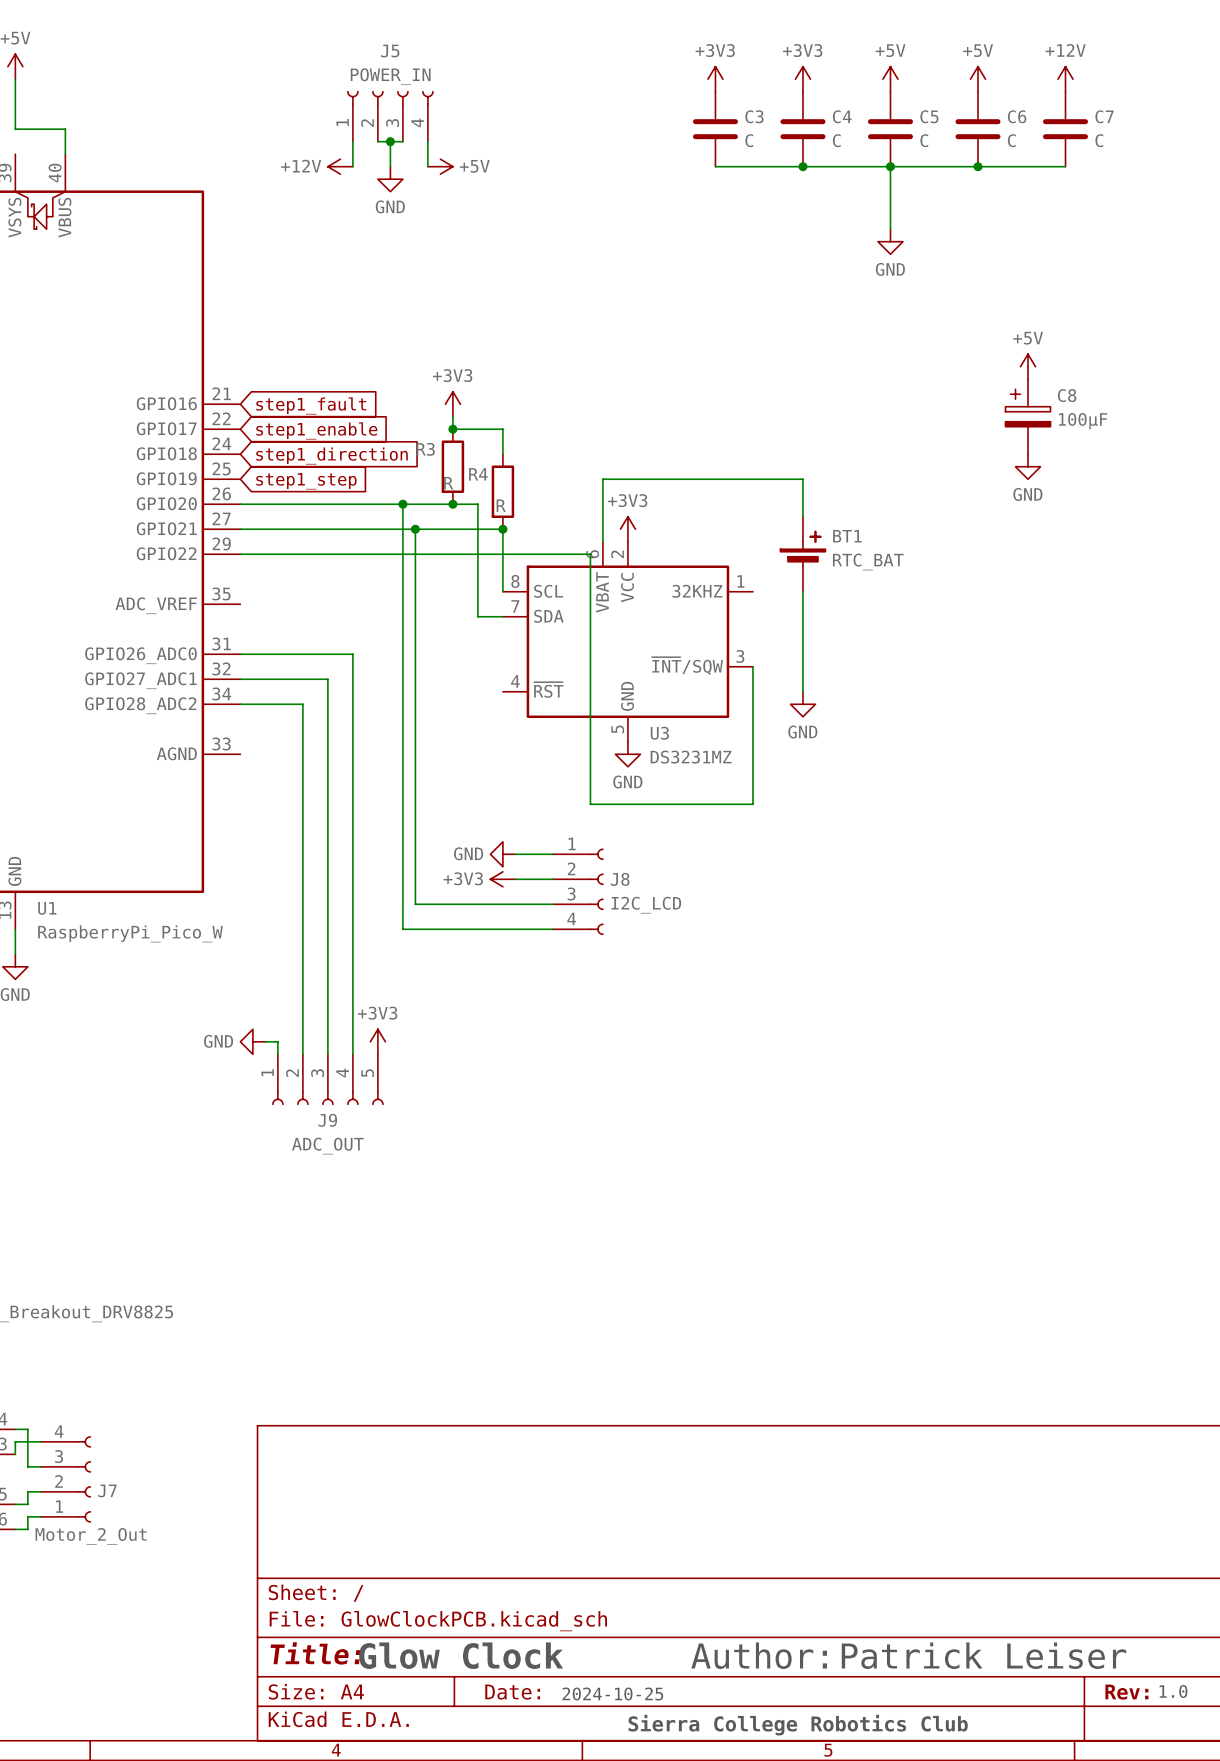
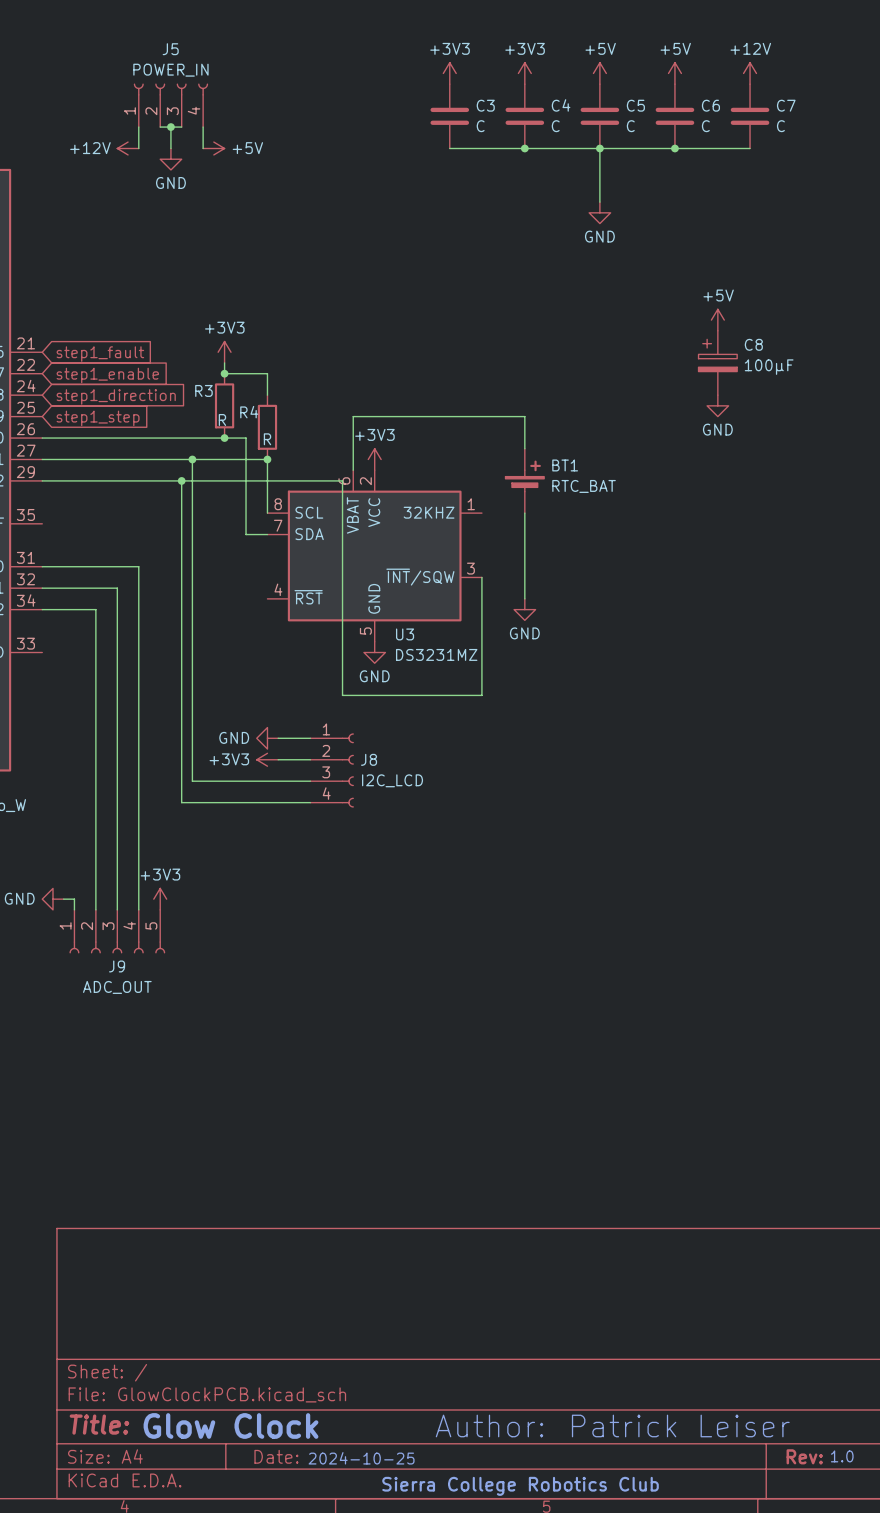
wire: (402, 504) (402, 554) -> none
junction position: (402, 504) -> (181, 480)

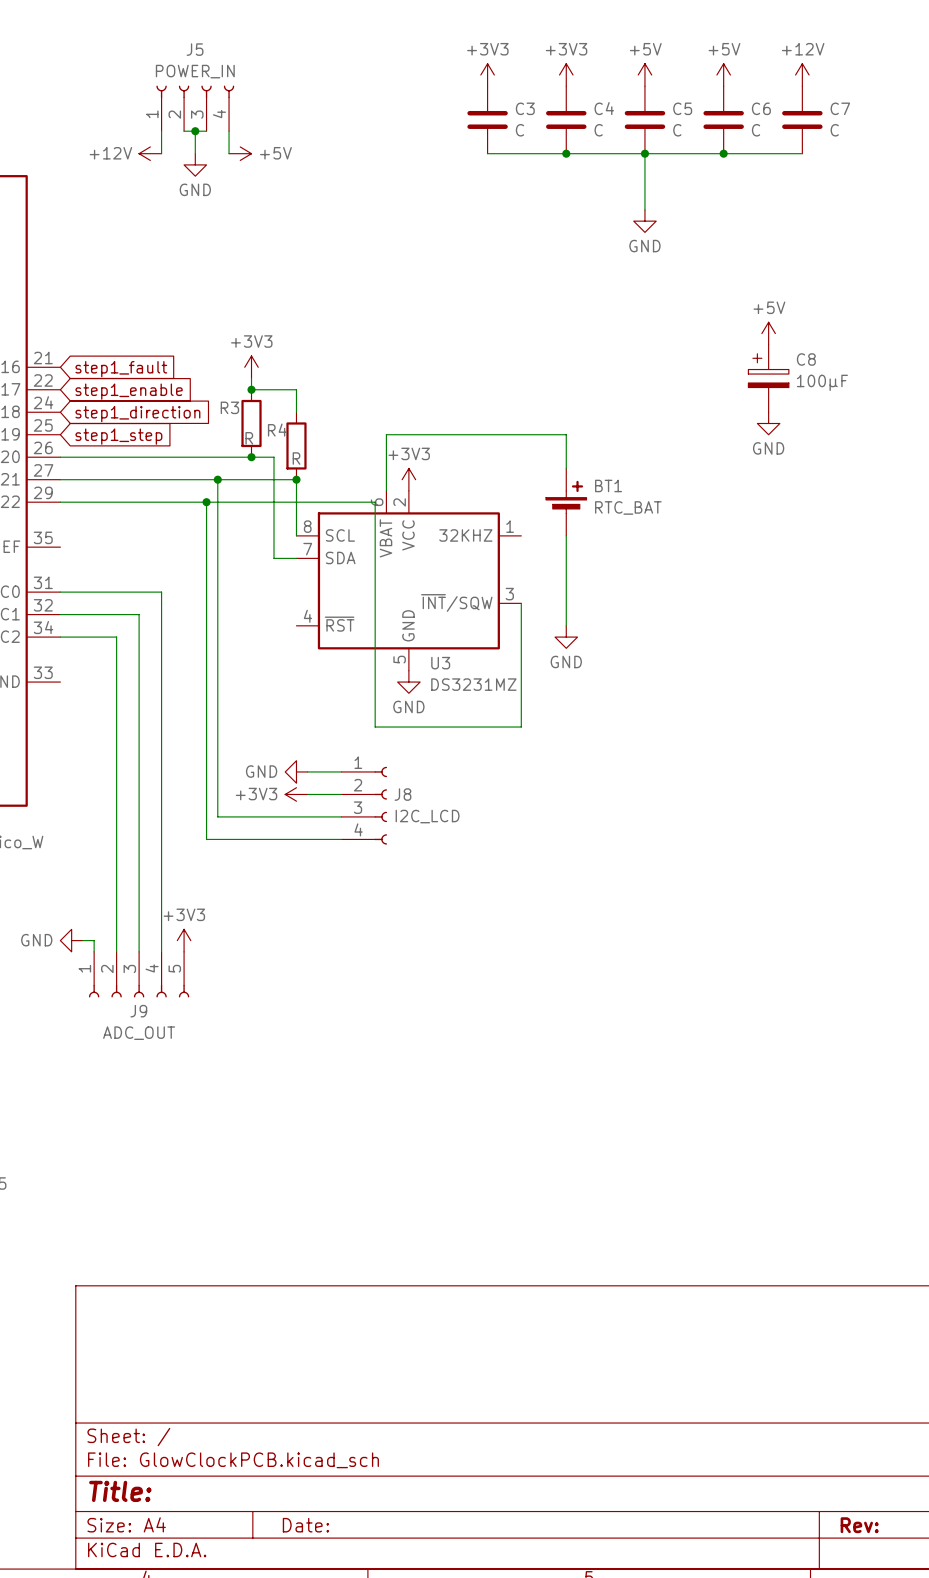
text: Glow Clock (231, 1425) -> none
text: Author: (489, 1425) -> none
text: Patrick Leiser (680, 1425) -> none
text: 1.0 (842, 1456) -> none
text: 2024-10-25 (361, 1458) -> none
text: Sierra College Robotics Club (520, 1486) -> none

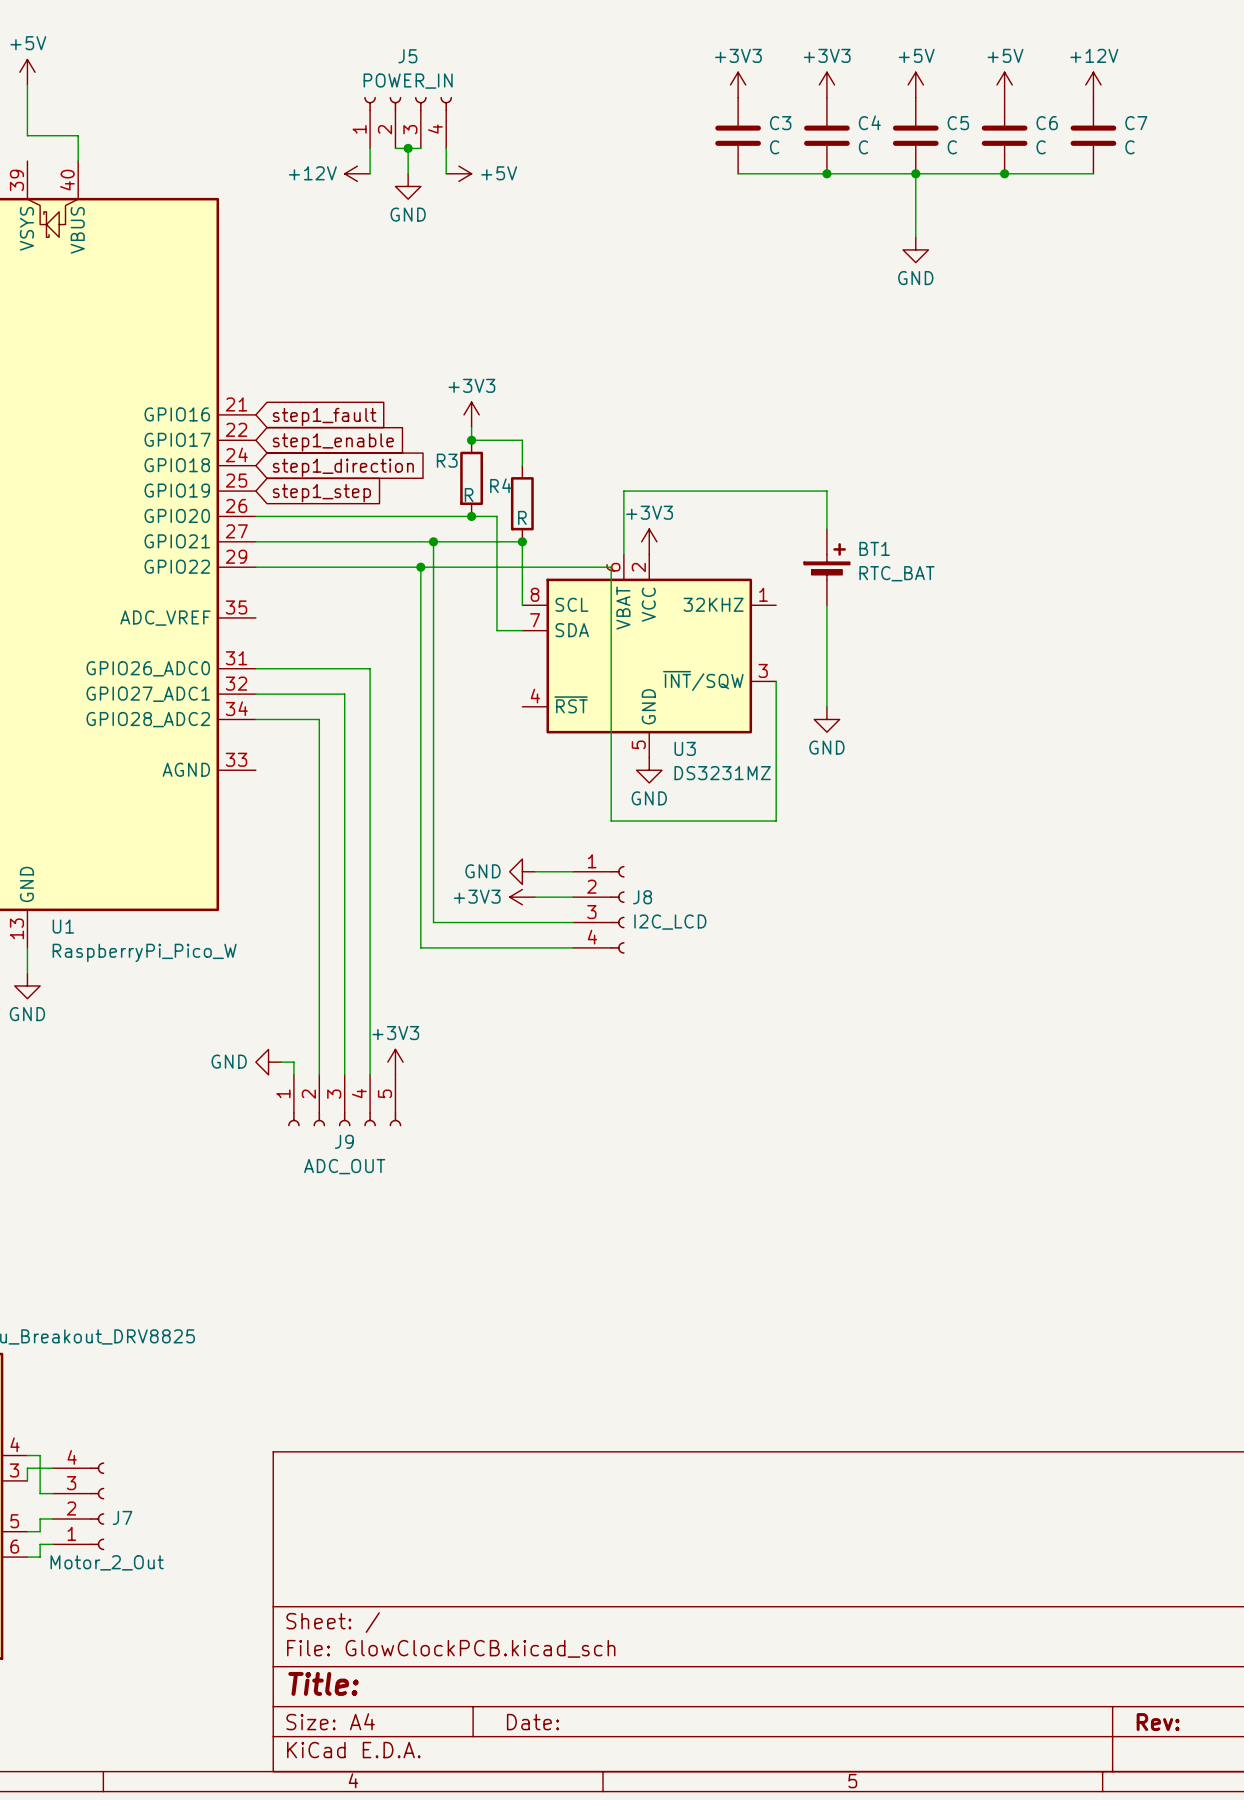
power symbol: +5V (768, 333) -> none
C8: 100µF (768, 378) -> none
power symbol: GND (768, 423) -> none

